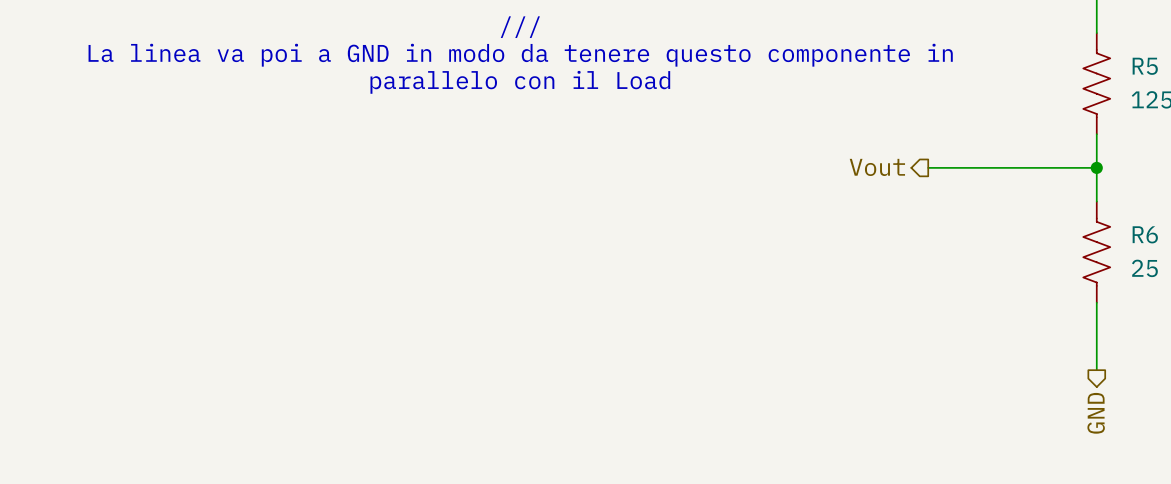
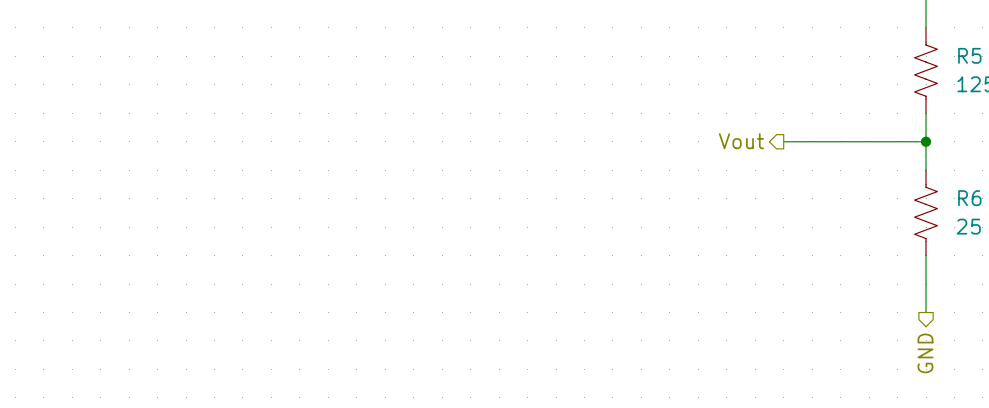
text: /// (520, 27) -> none
text: La linea va poi a GND in modo da tenere questo componente in (520, 55) -> none
text: parallelo con il Load (520, 82) -> none

